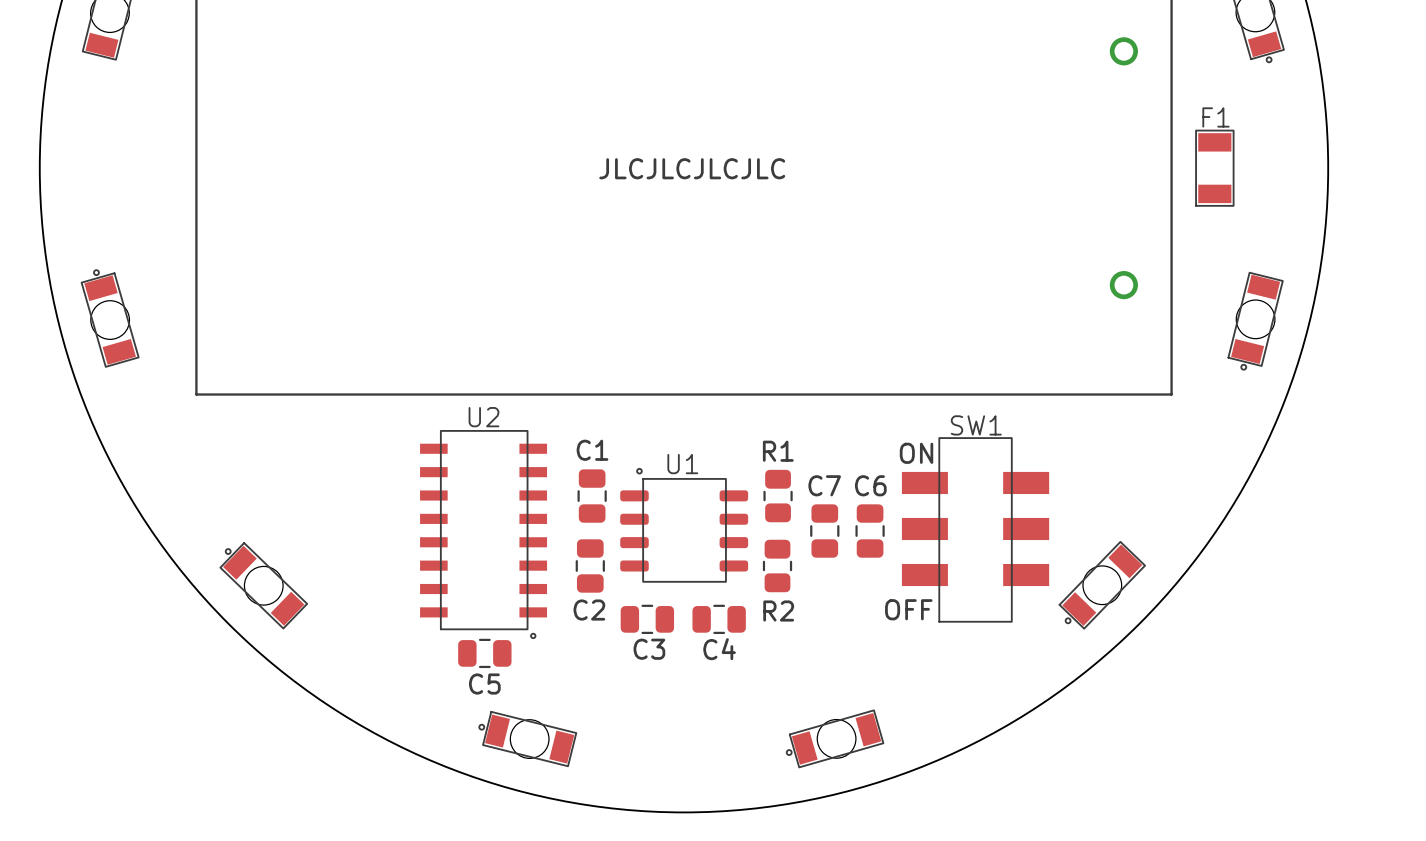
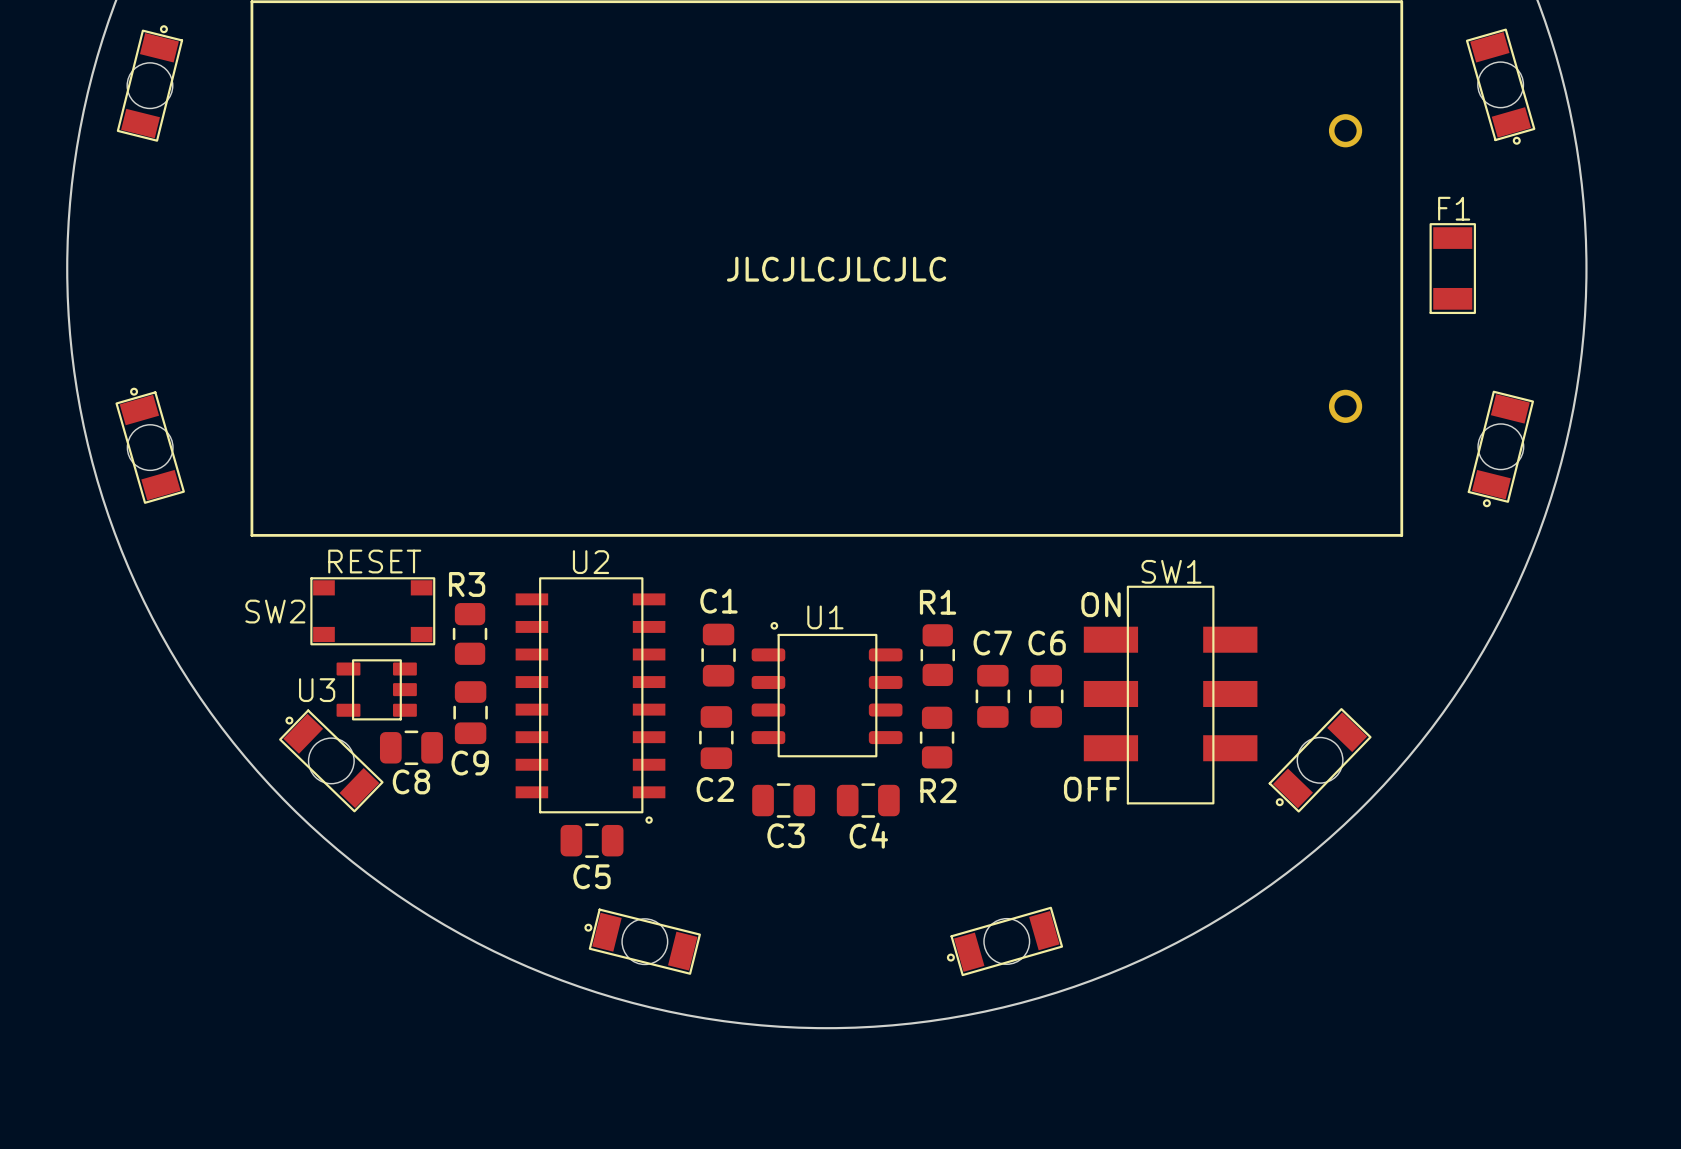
text: none -> RESET (374, 561)
SW2: none -> (372, 611)
R3: none -> (470, 633)
U3: none -> (376, 689)
C9: none -> (470, 712)
C8: none -> (411, 747)

